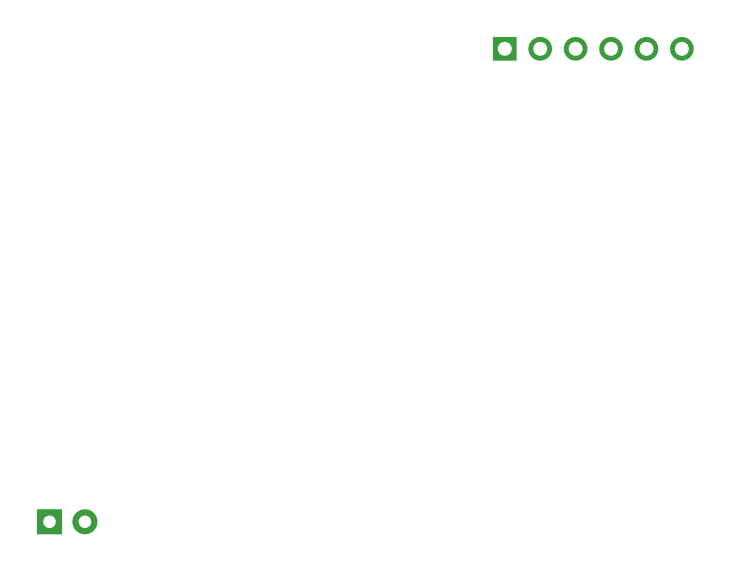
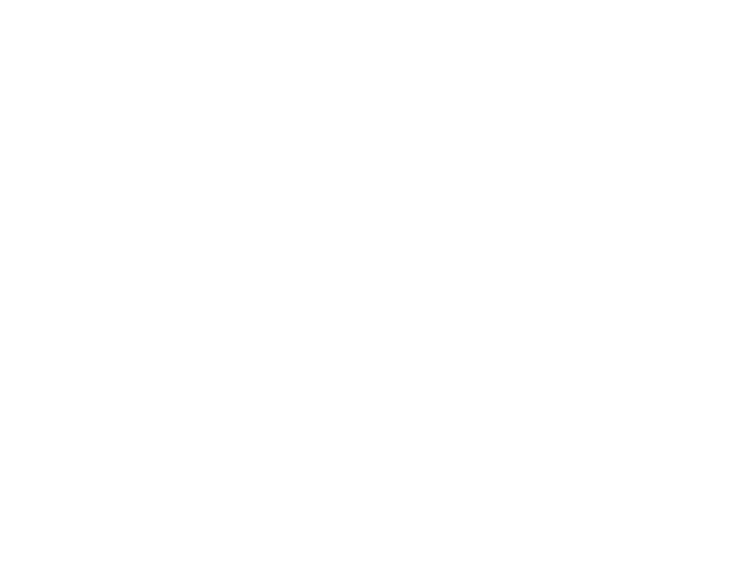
part: (593, 48) -> none
part: (67, 521) -> none

